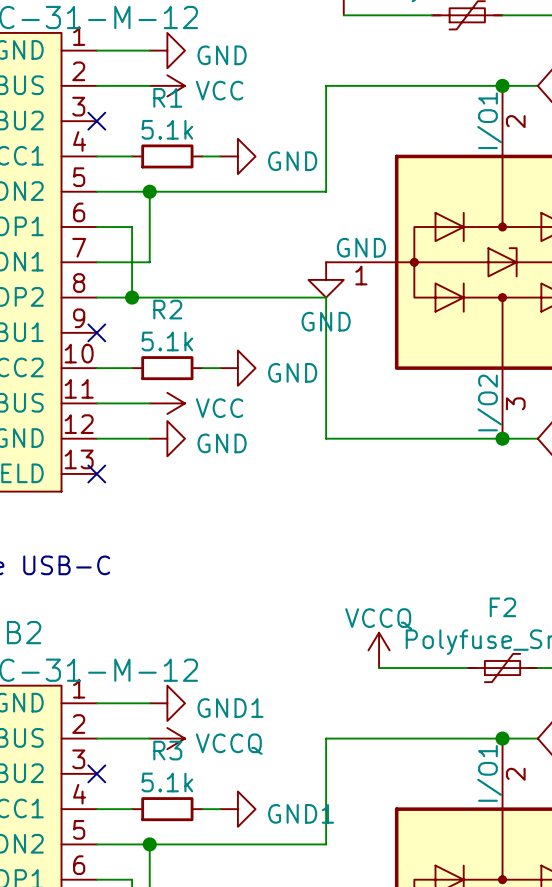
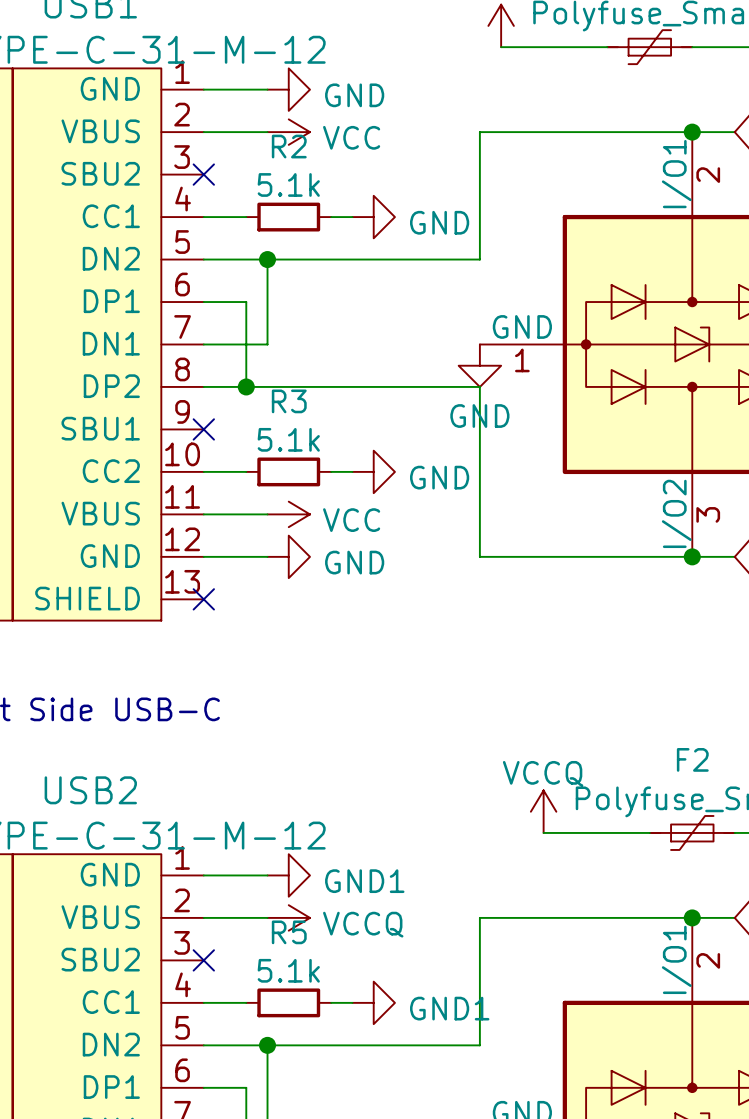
R1 name: R1 (167, 97) -> R2 (289, 146)
R2 name: R2 (167, 309) -> R3 (289, 401)
R3 name: R3 (167, 750) -> R5 (289, 932)

